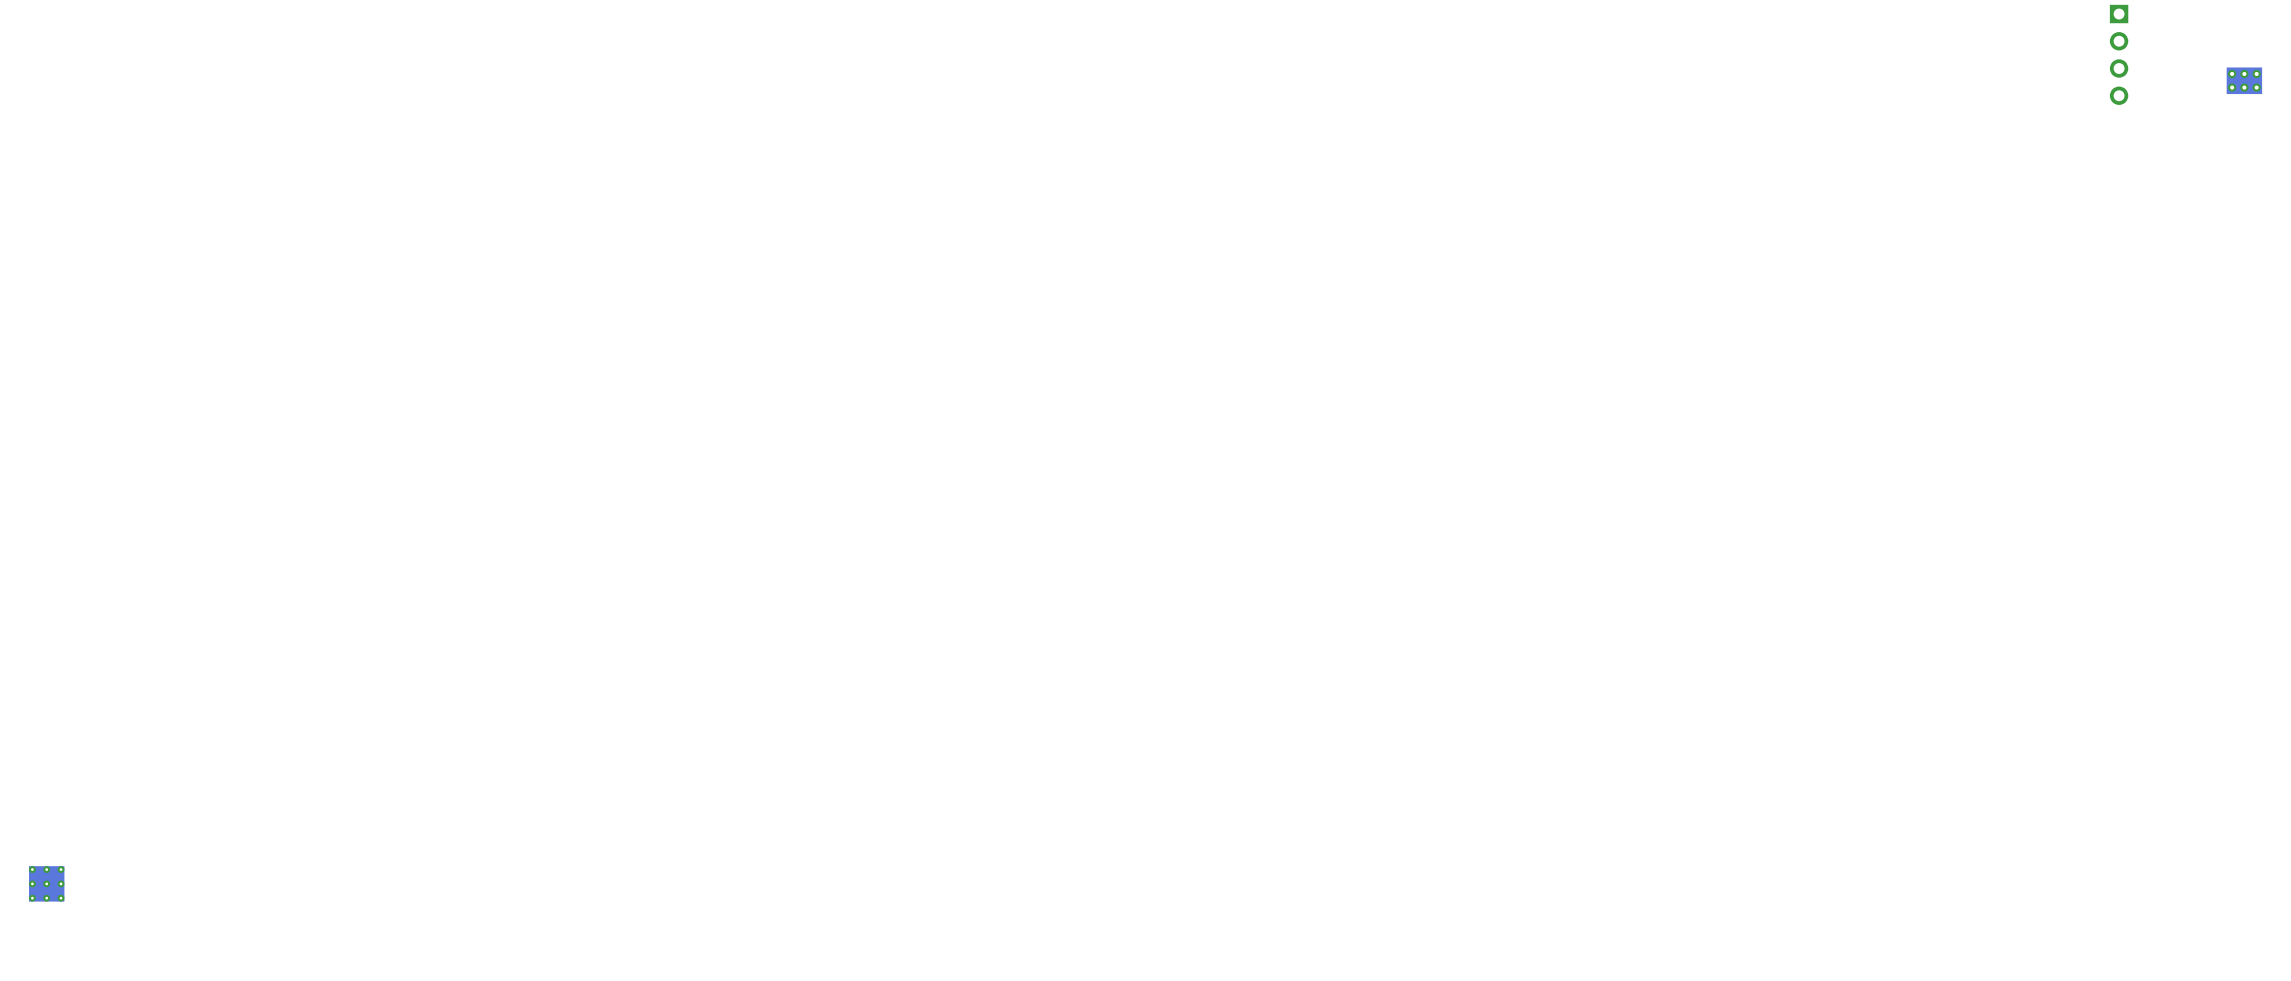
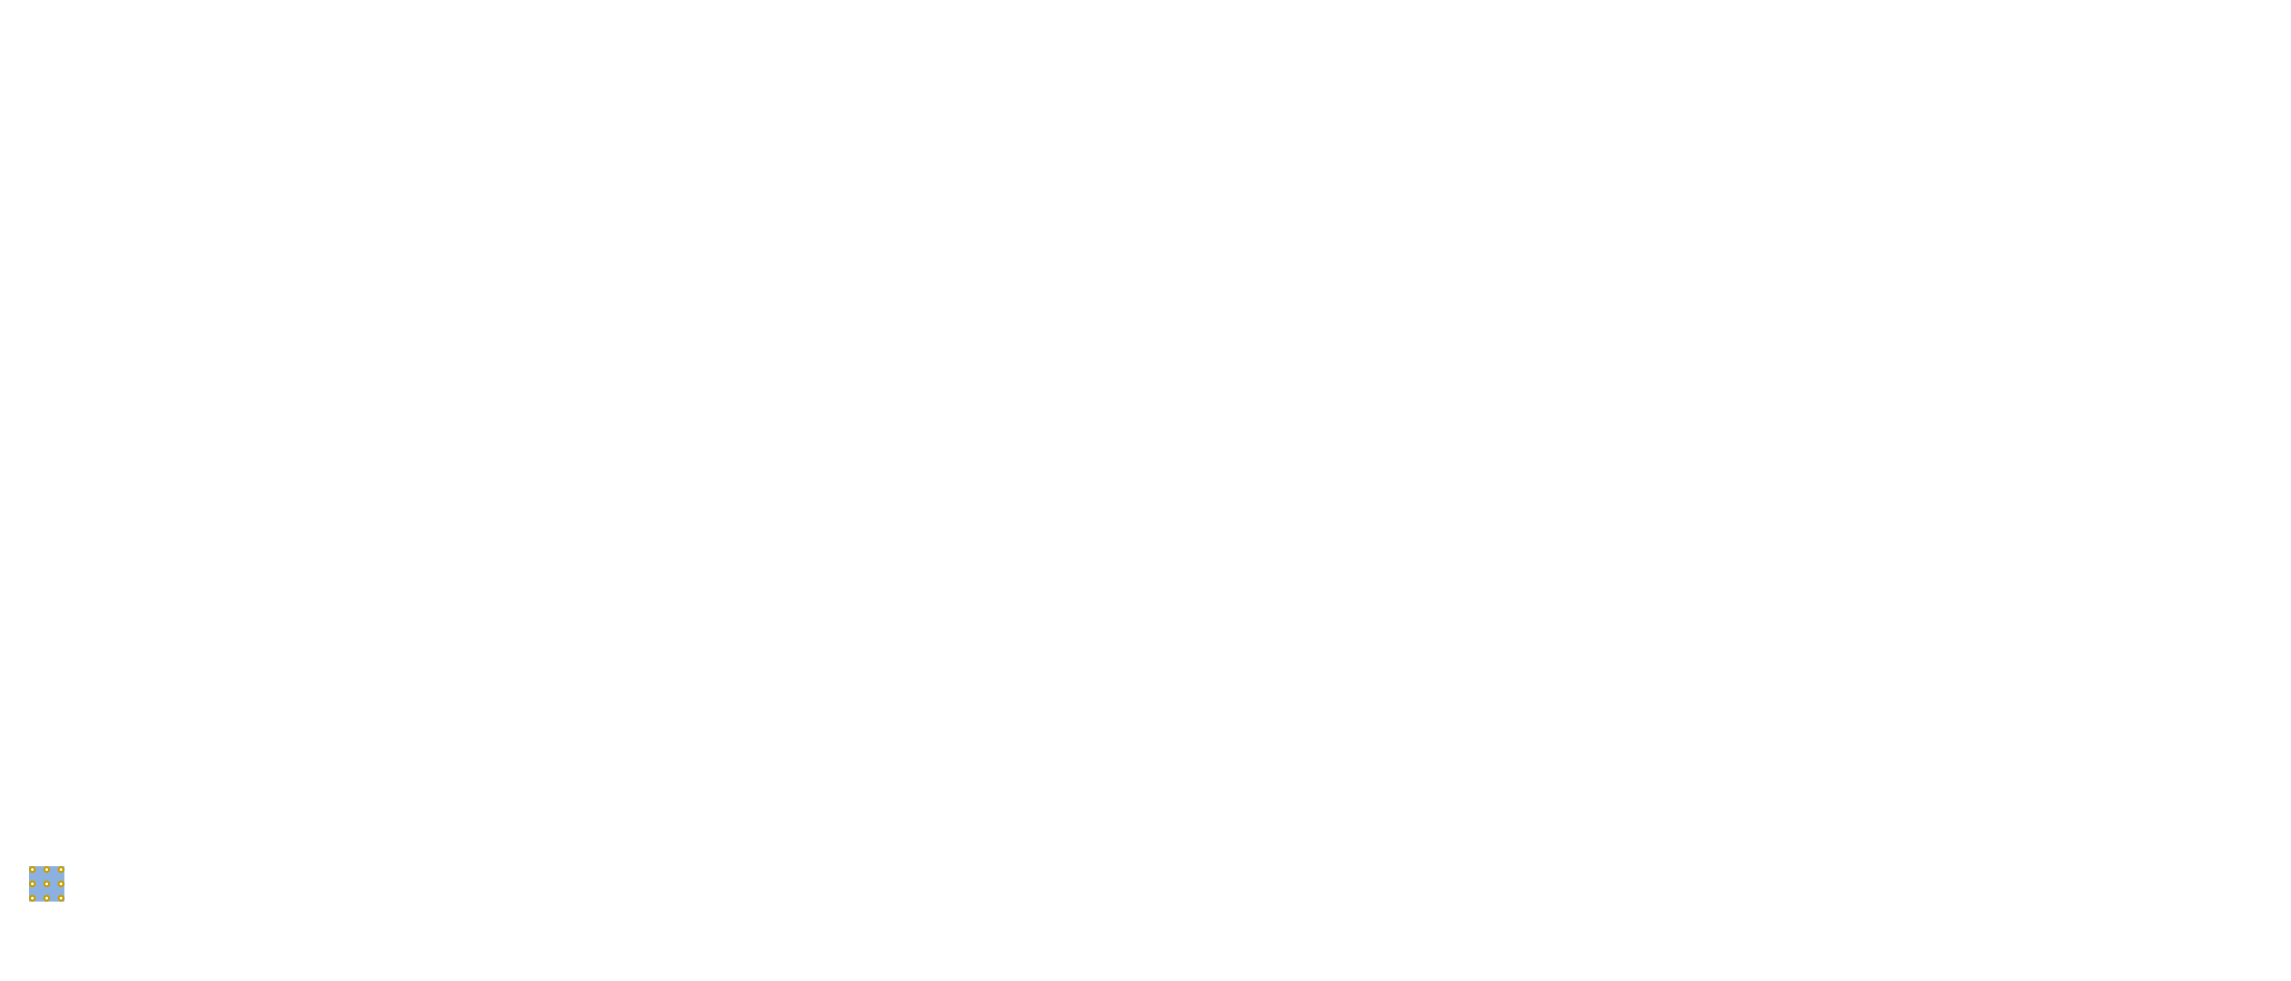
part: (2119, 54) -> none
part: (2244, 80) -> none

